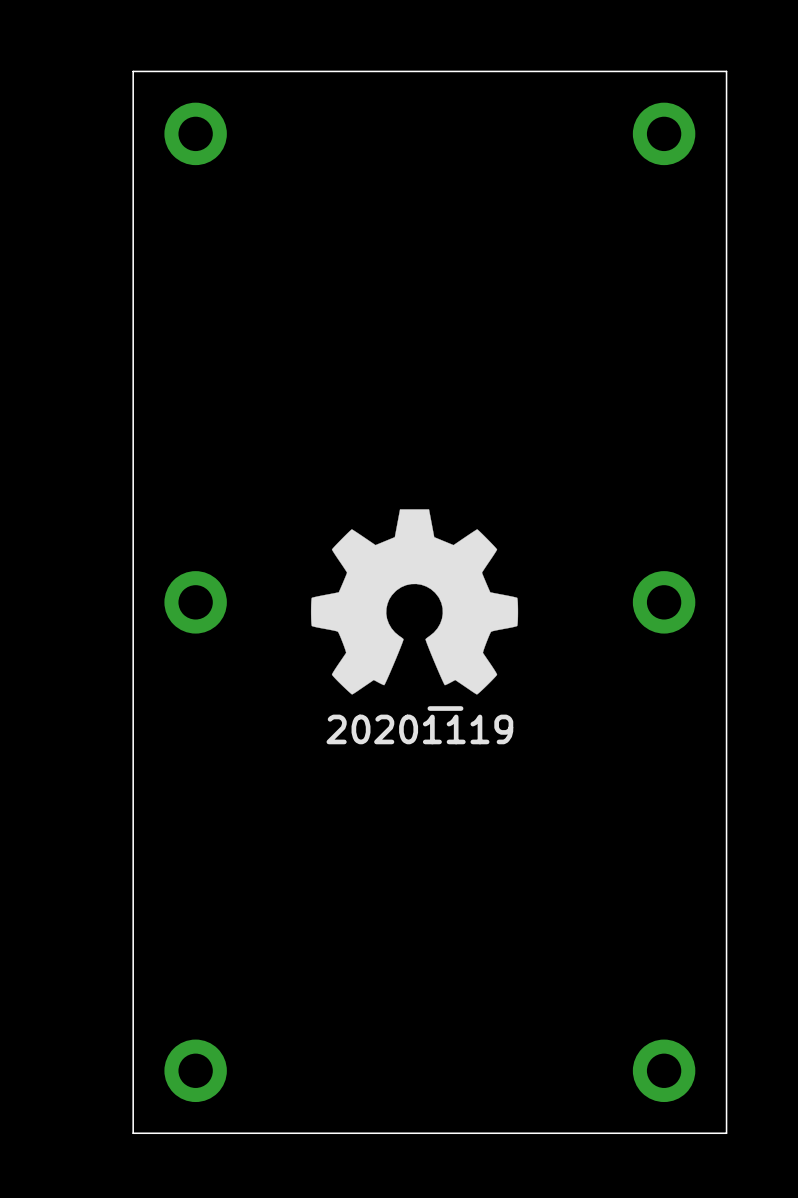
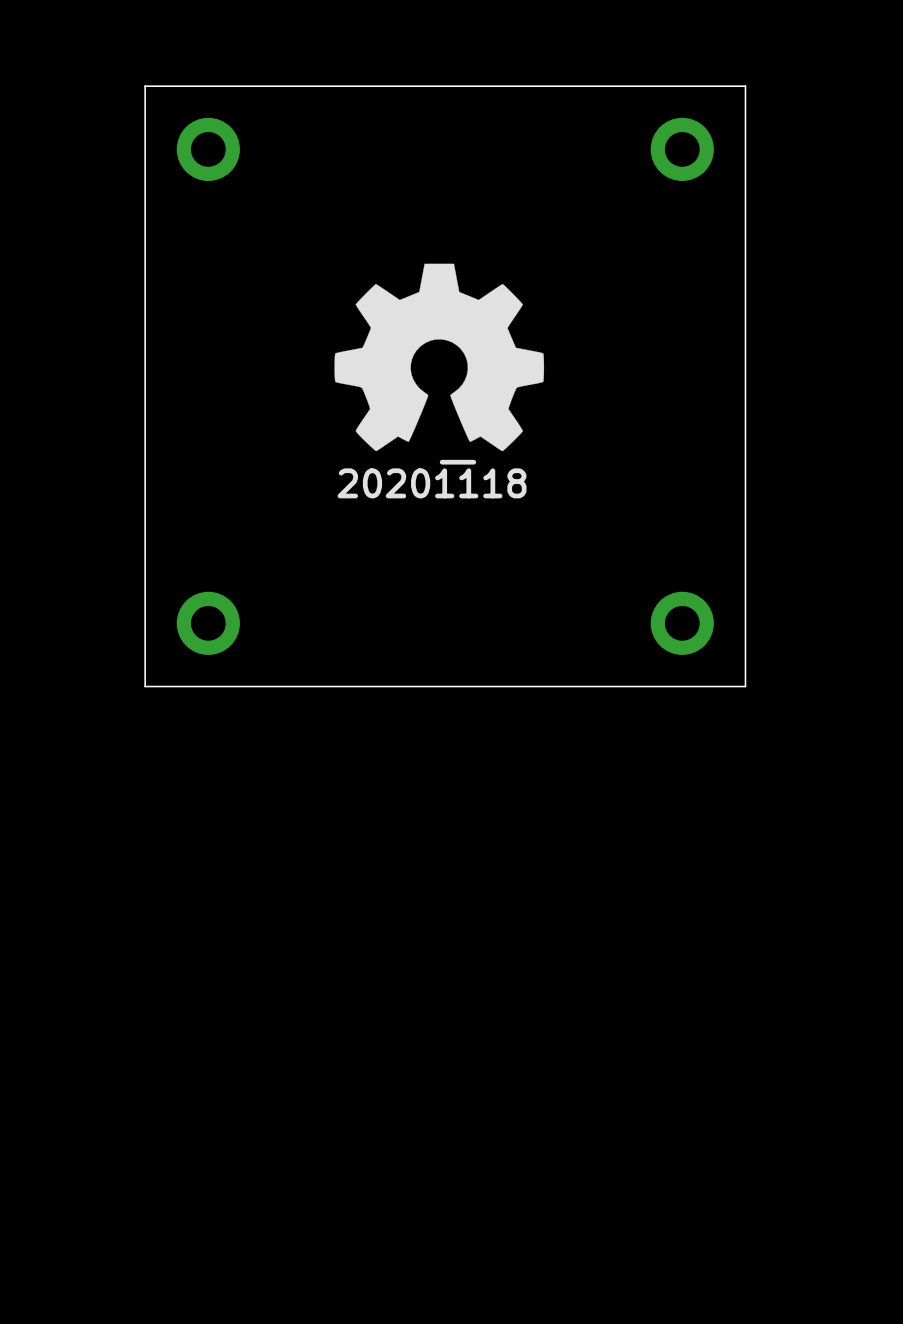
drawing: none -> [439, 459, 477, 465]
drawing position: (414, 601) -> (439, 357)
board edge: (726, 664) (726, 1133) (133, 1133) (133, 664) -> (745, 686) (145, 686)
drawing: [427, 706, 464, 711] -> none
part: (195, 1070) -> none
part: (664, 1070) -> none

